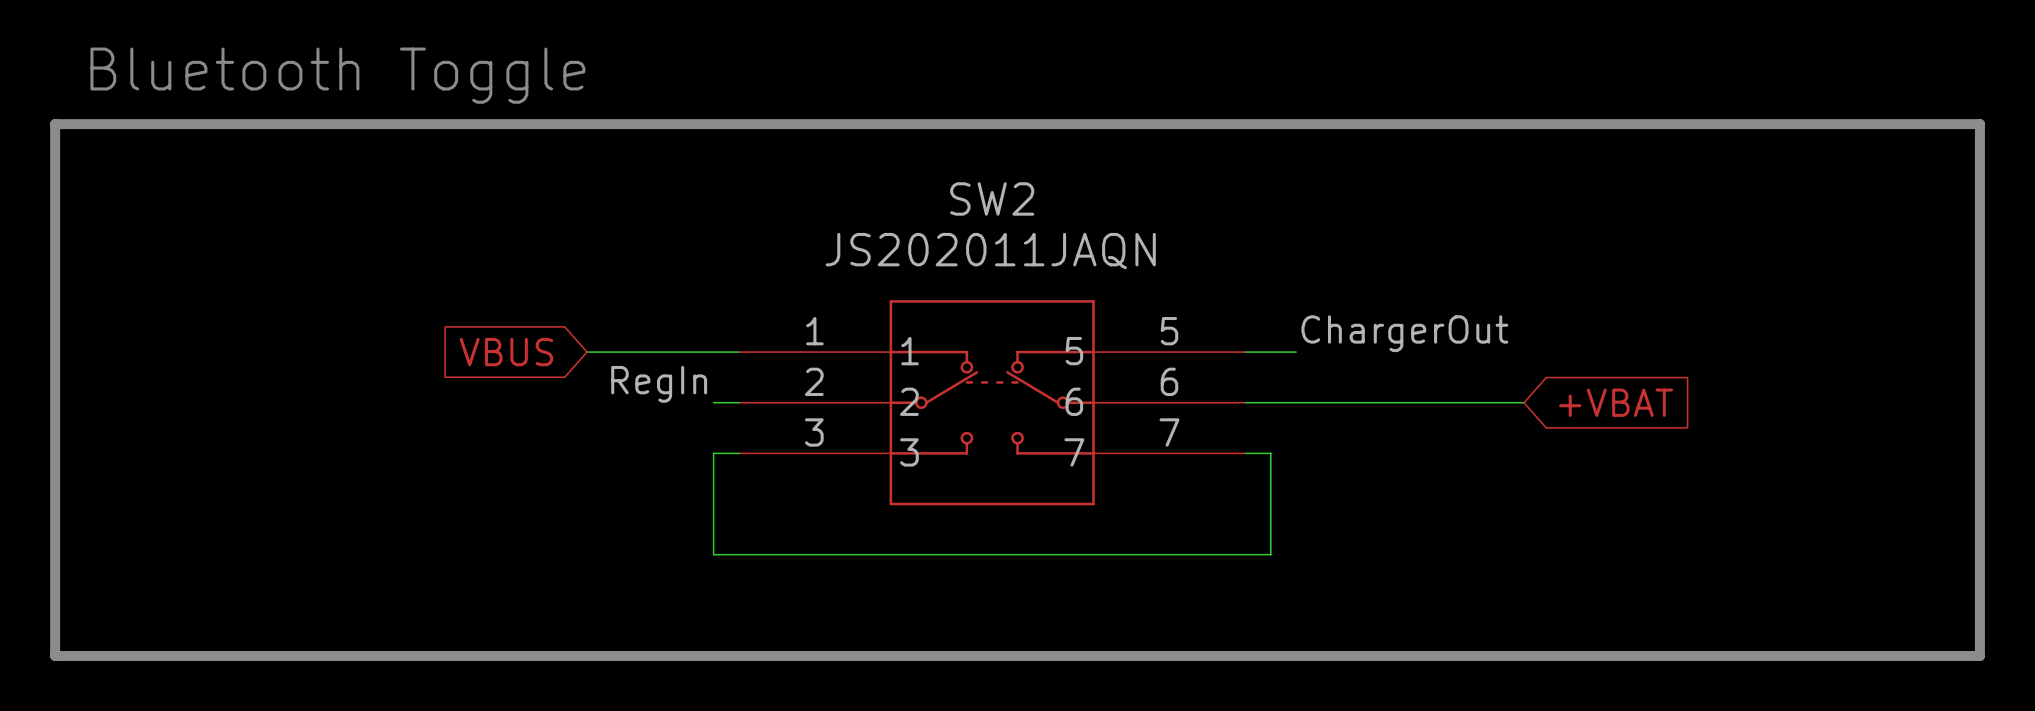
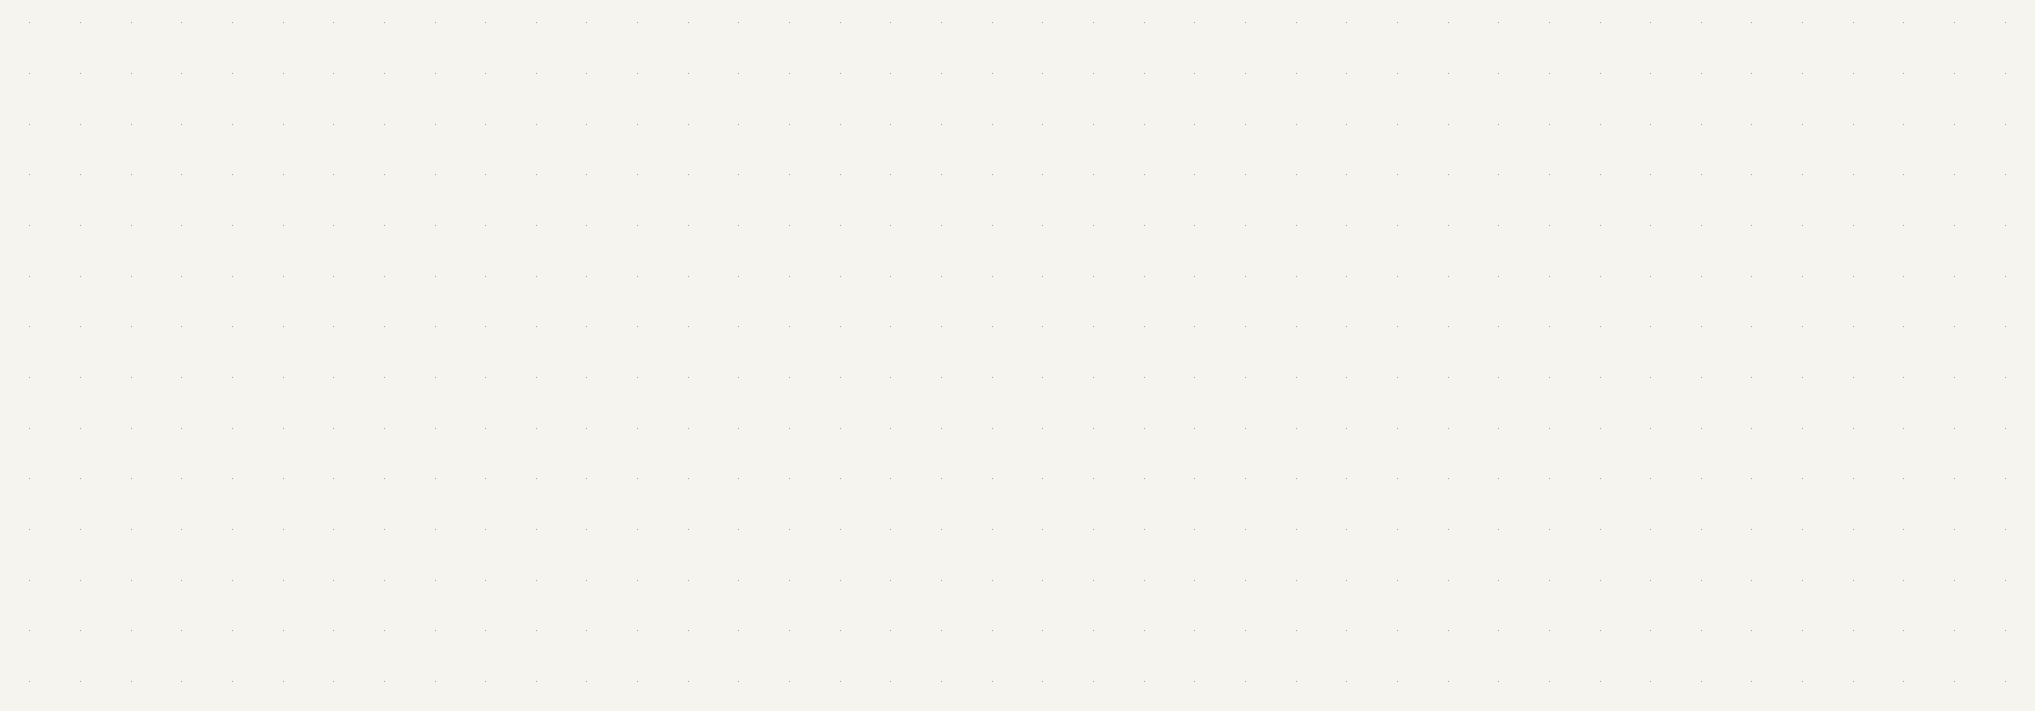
text: Bluetooth Toggle (337, 75) -> none
line: (55, 124) (1979, 124) (1979, 655) (55, 655) (55, 124) -> none
label: ChargerOut (1404, 333) -> none
global label: VBUS (506, 352) -> none
wire: (586, 352) (738, 352) -> none
wire: (1245, 352) (1296, 352) -> none
label: RegIn (659, 384) -> none
wire: (713, 402) (738, 402) -> none
SW2: JS202011JAQN (992, 402) -> none
wire: (1245, 402) (1524, 402) -> none
global label: +VBAT (1616, 402) -> none
wire: (738, 453) (713, 453) (713, 554) (1270, 554) (1270, 453) (1245, 453) -> none

